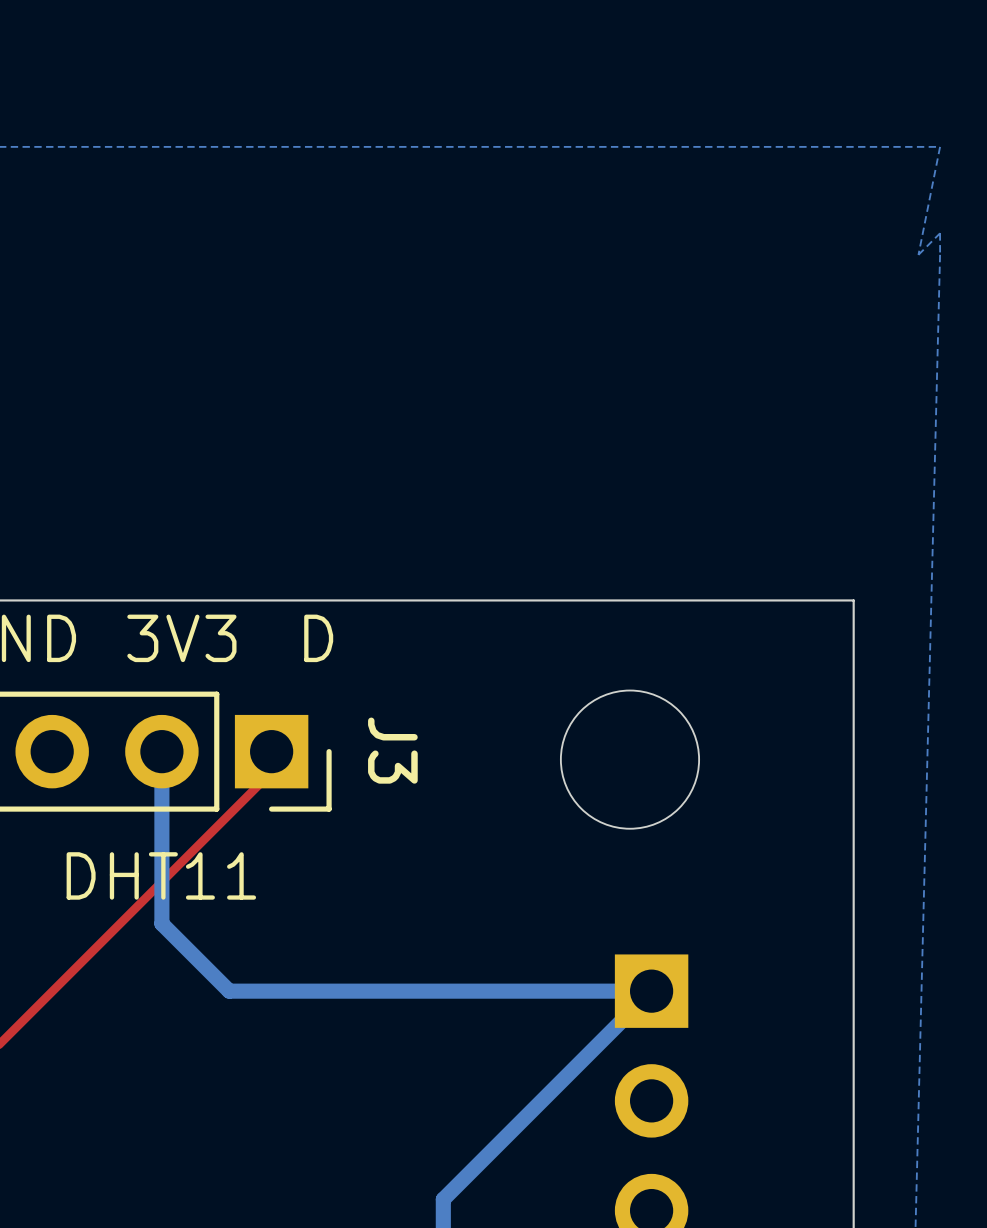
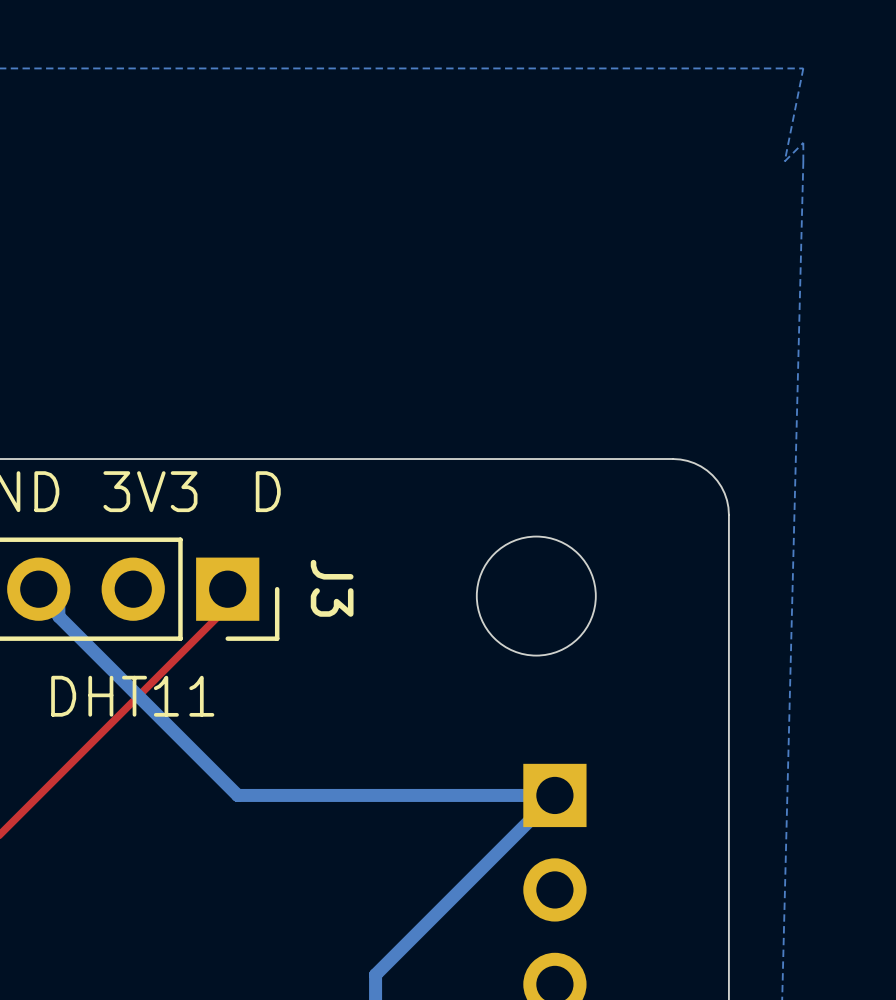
board edge: (788, 600) (853, 600) (853, 665) -> (673, 459) (694, 463) (712, 475) (724, 493) (728, 514)
bottom track: (161, 751) (161, 923) (229, 991) (283, 991) -> (58, 590) (58, 616) (237, 795)

